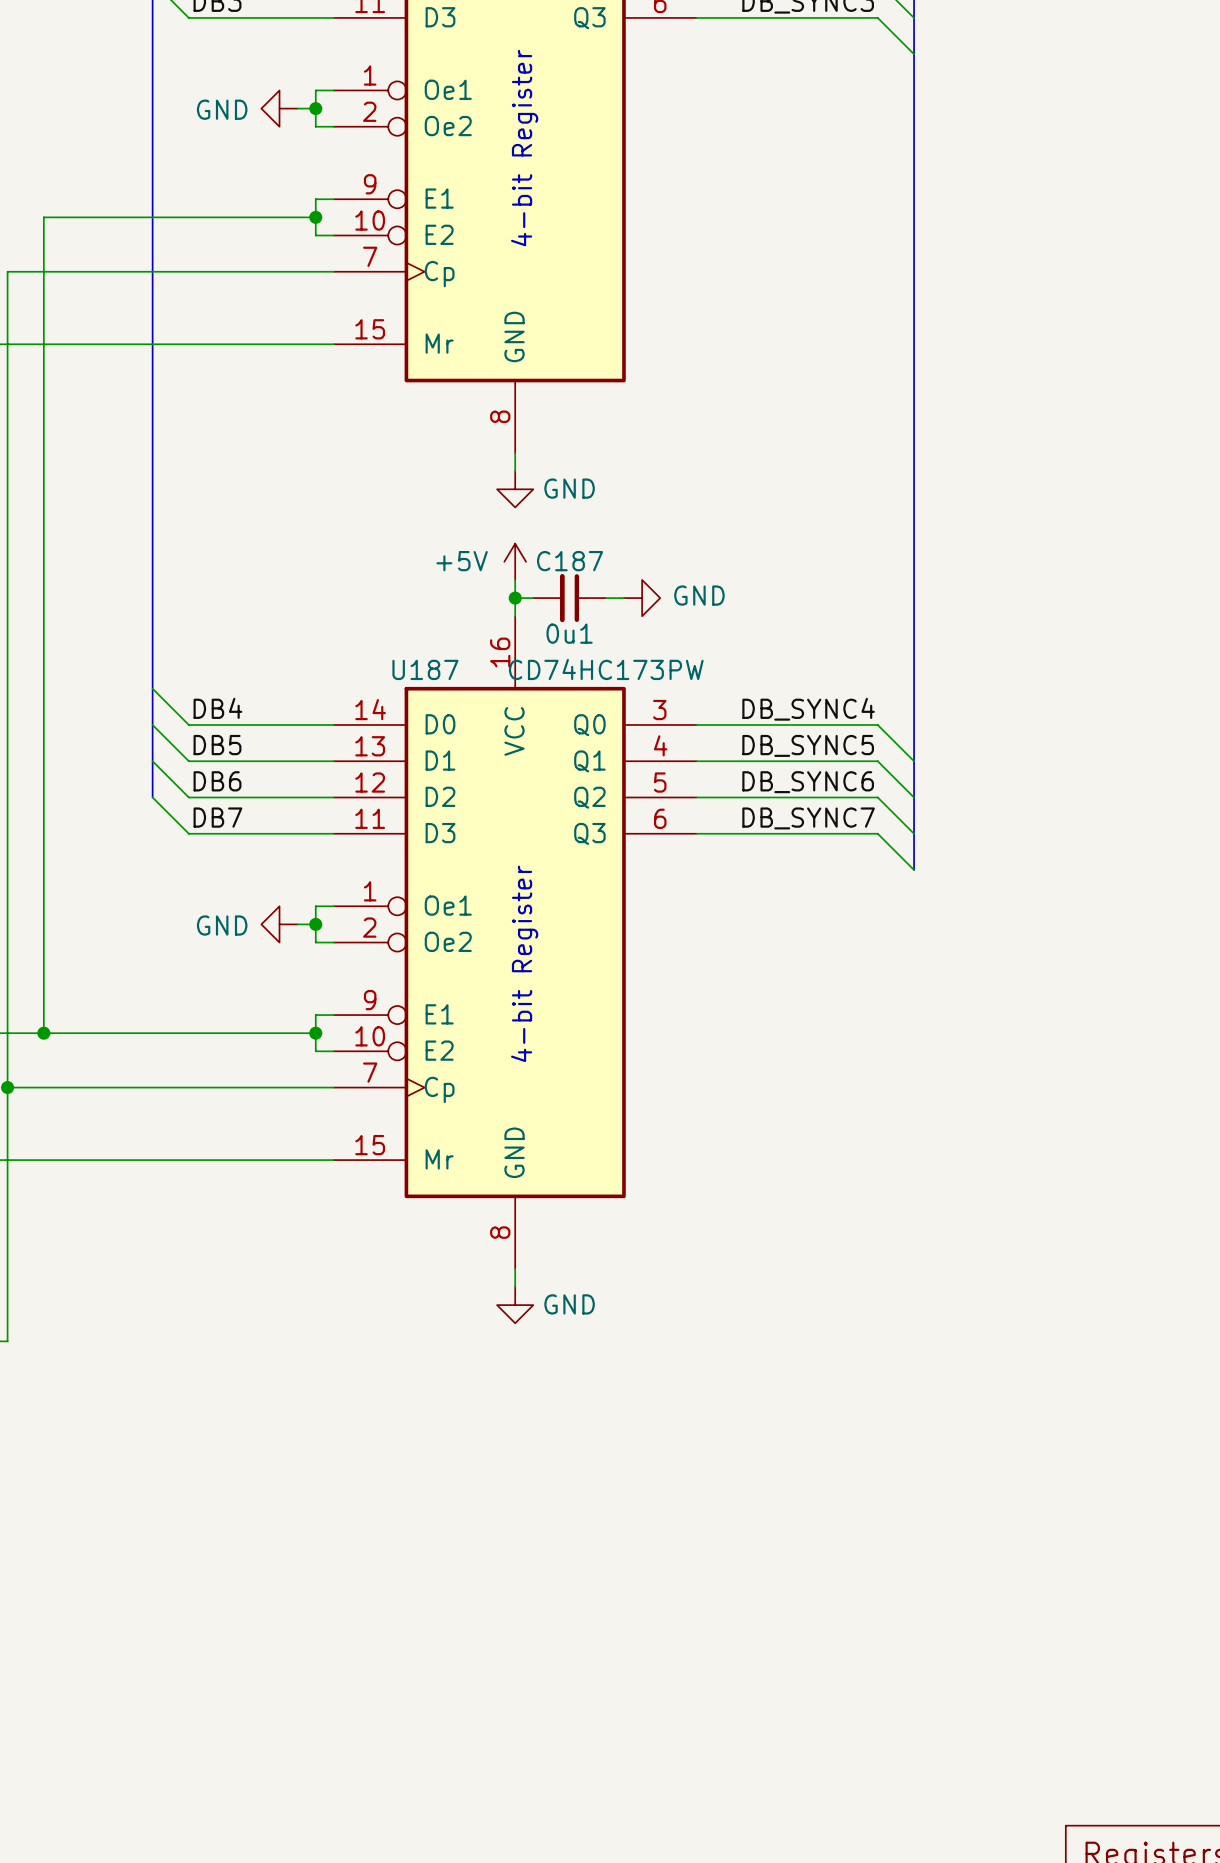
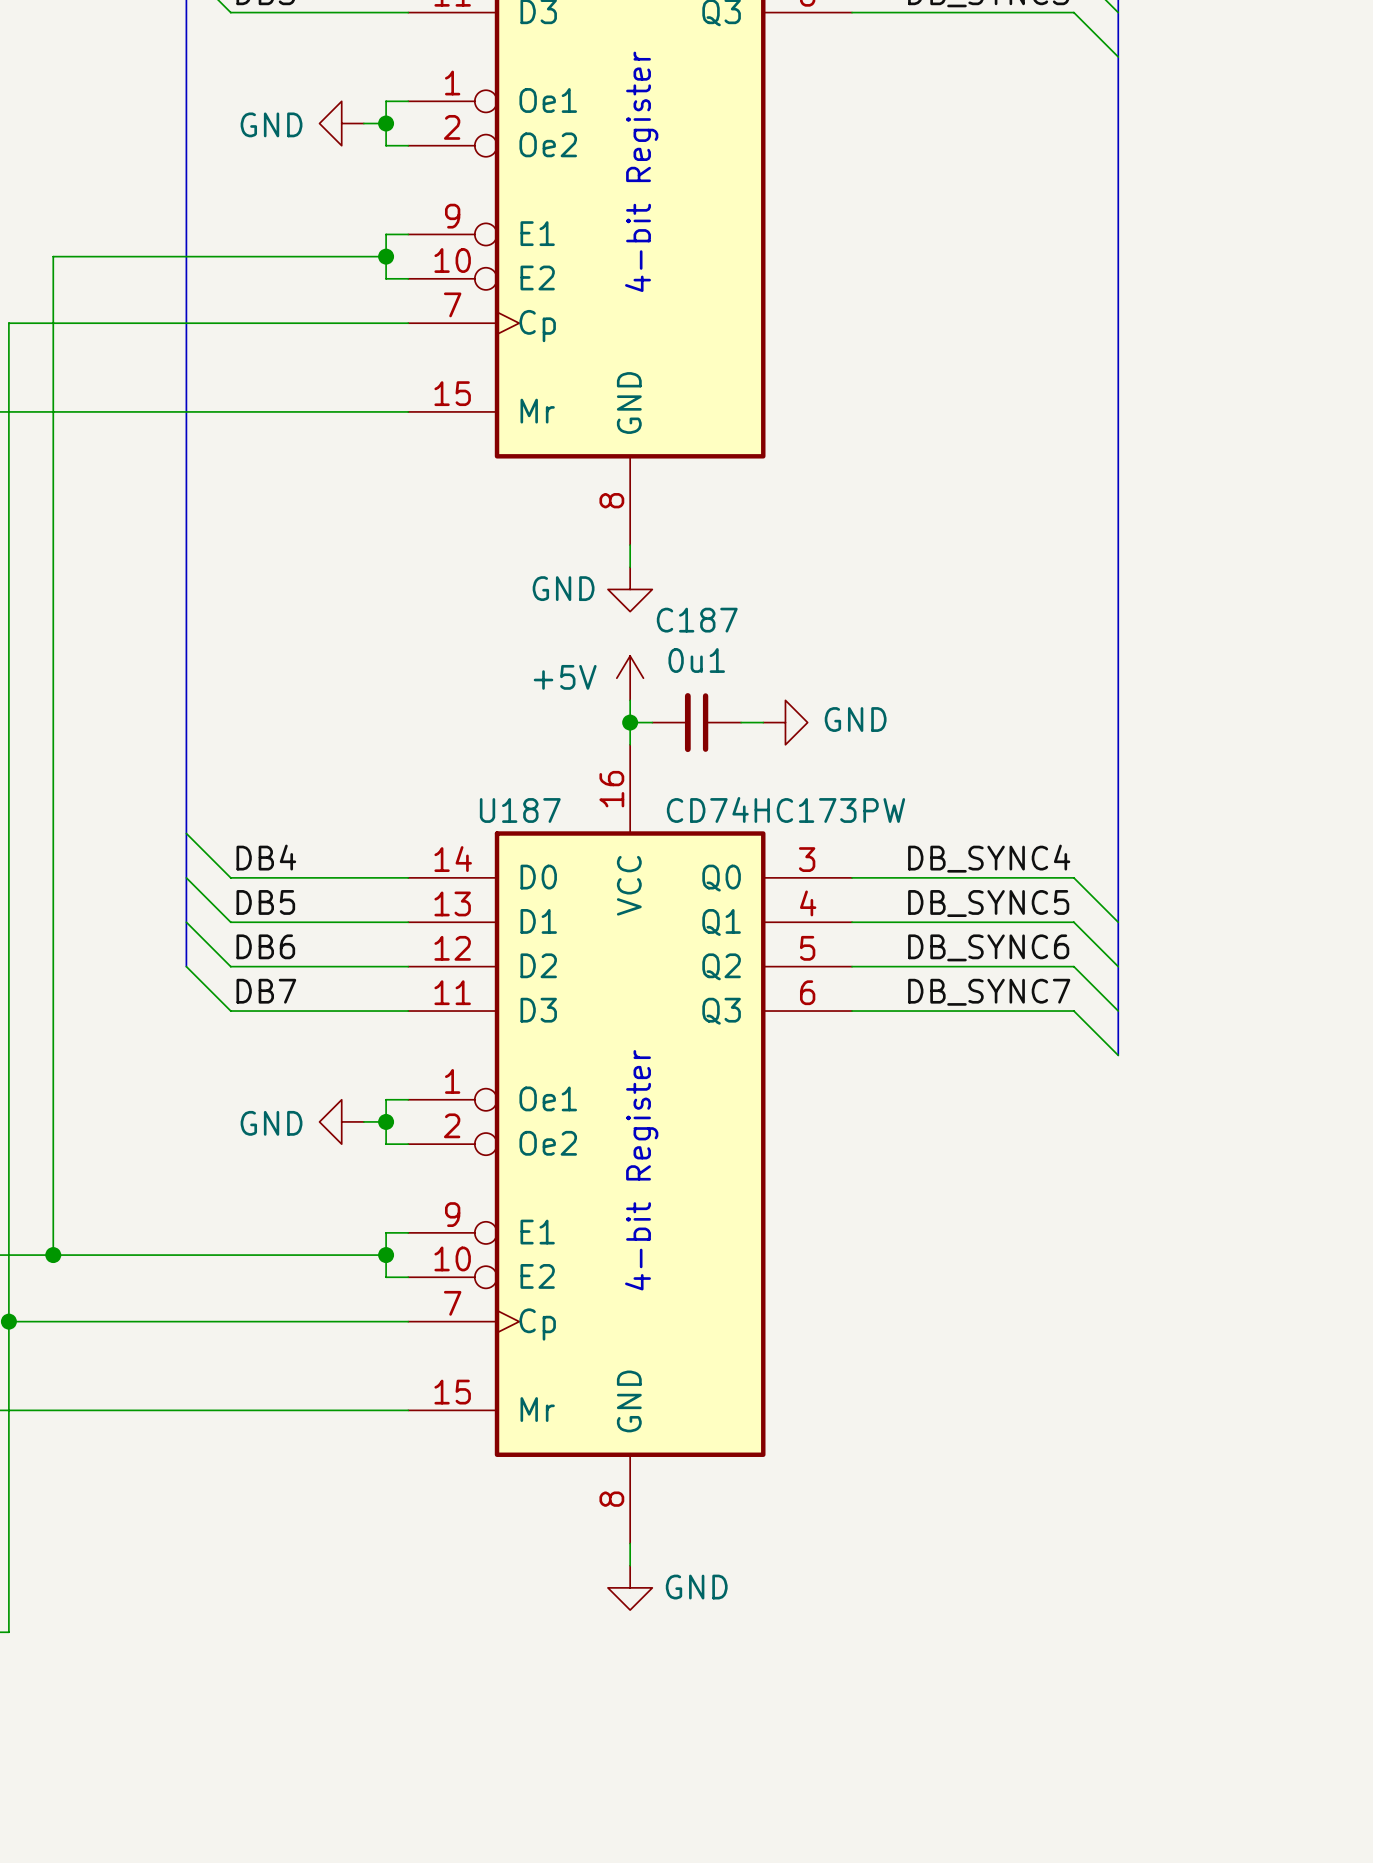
power symbol text position: GND (569, 488) -> GND (563, 588)
C187 name position: C187 (570, 561) -> C187 (697, 620)
C187 value position: 0u1 (569, 633) -> 0u1 (696, 660)
U187 value position: CD74HC173PW (606, 669) -> CD74HC173PW (785, 809)

